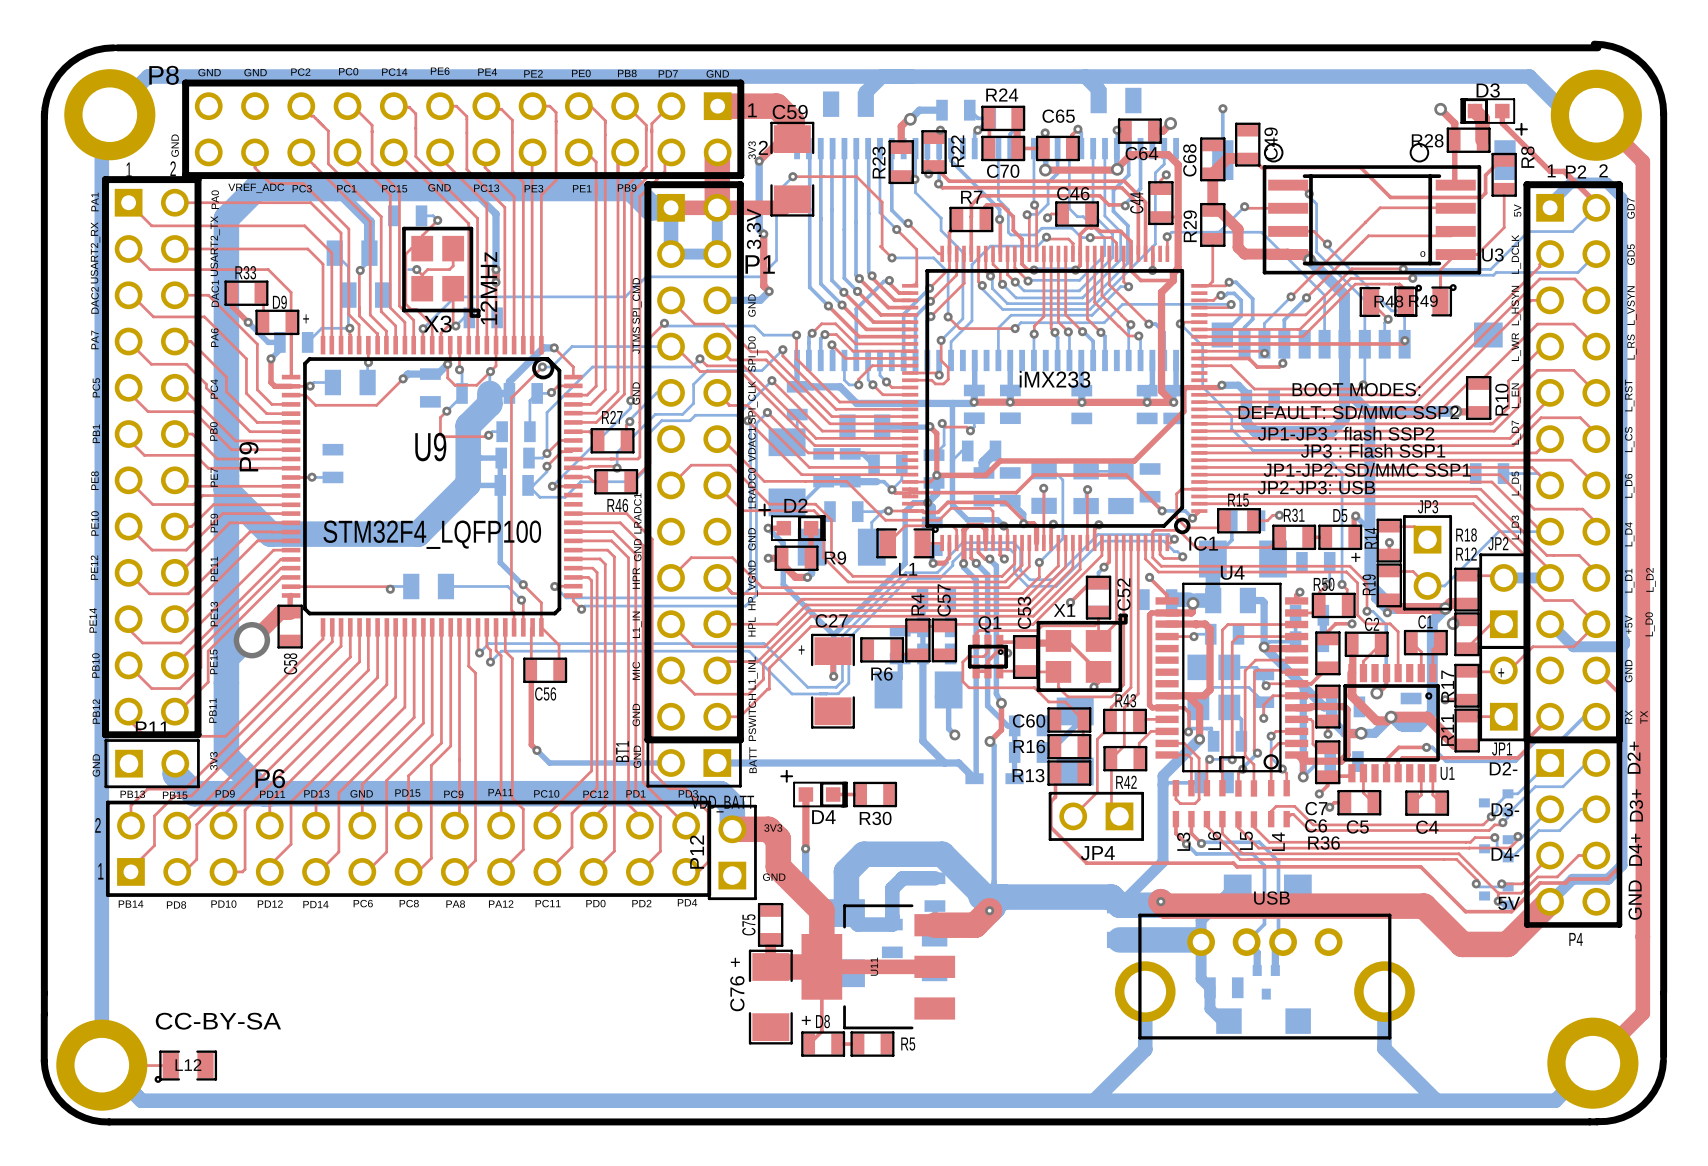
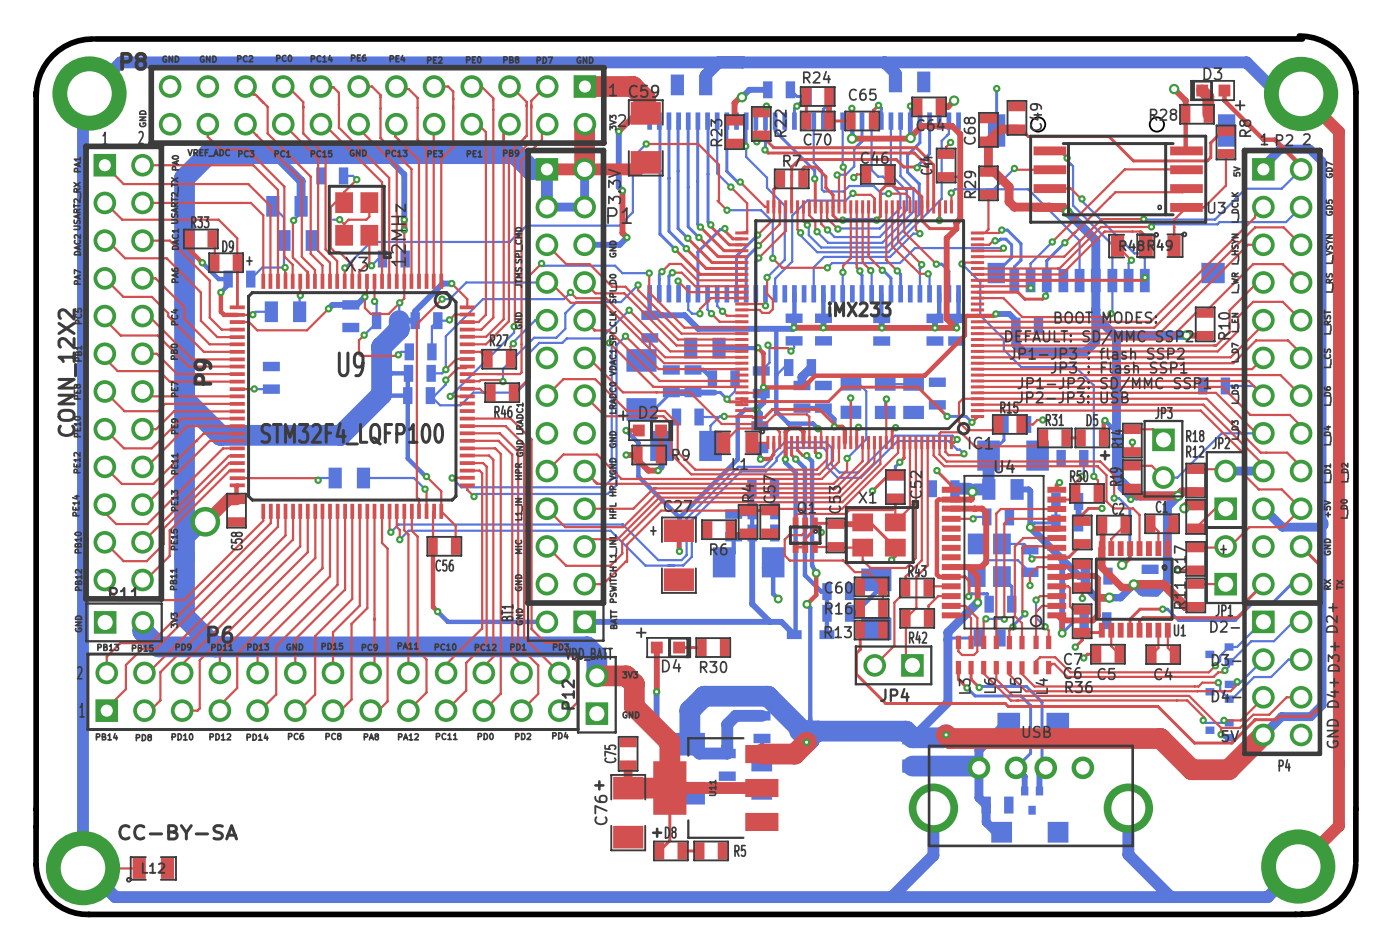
P9 value: none -> CONN_12X2 (67, 372)

